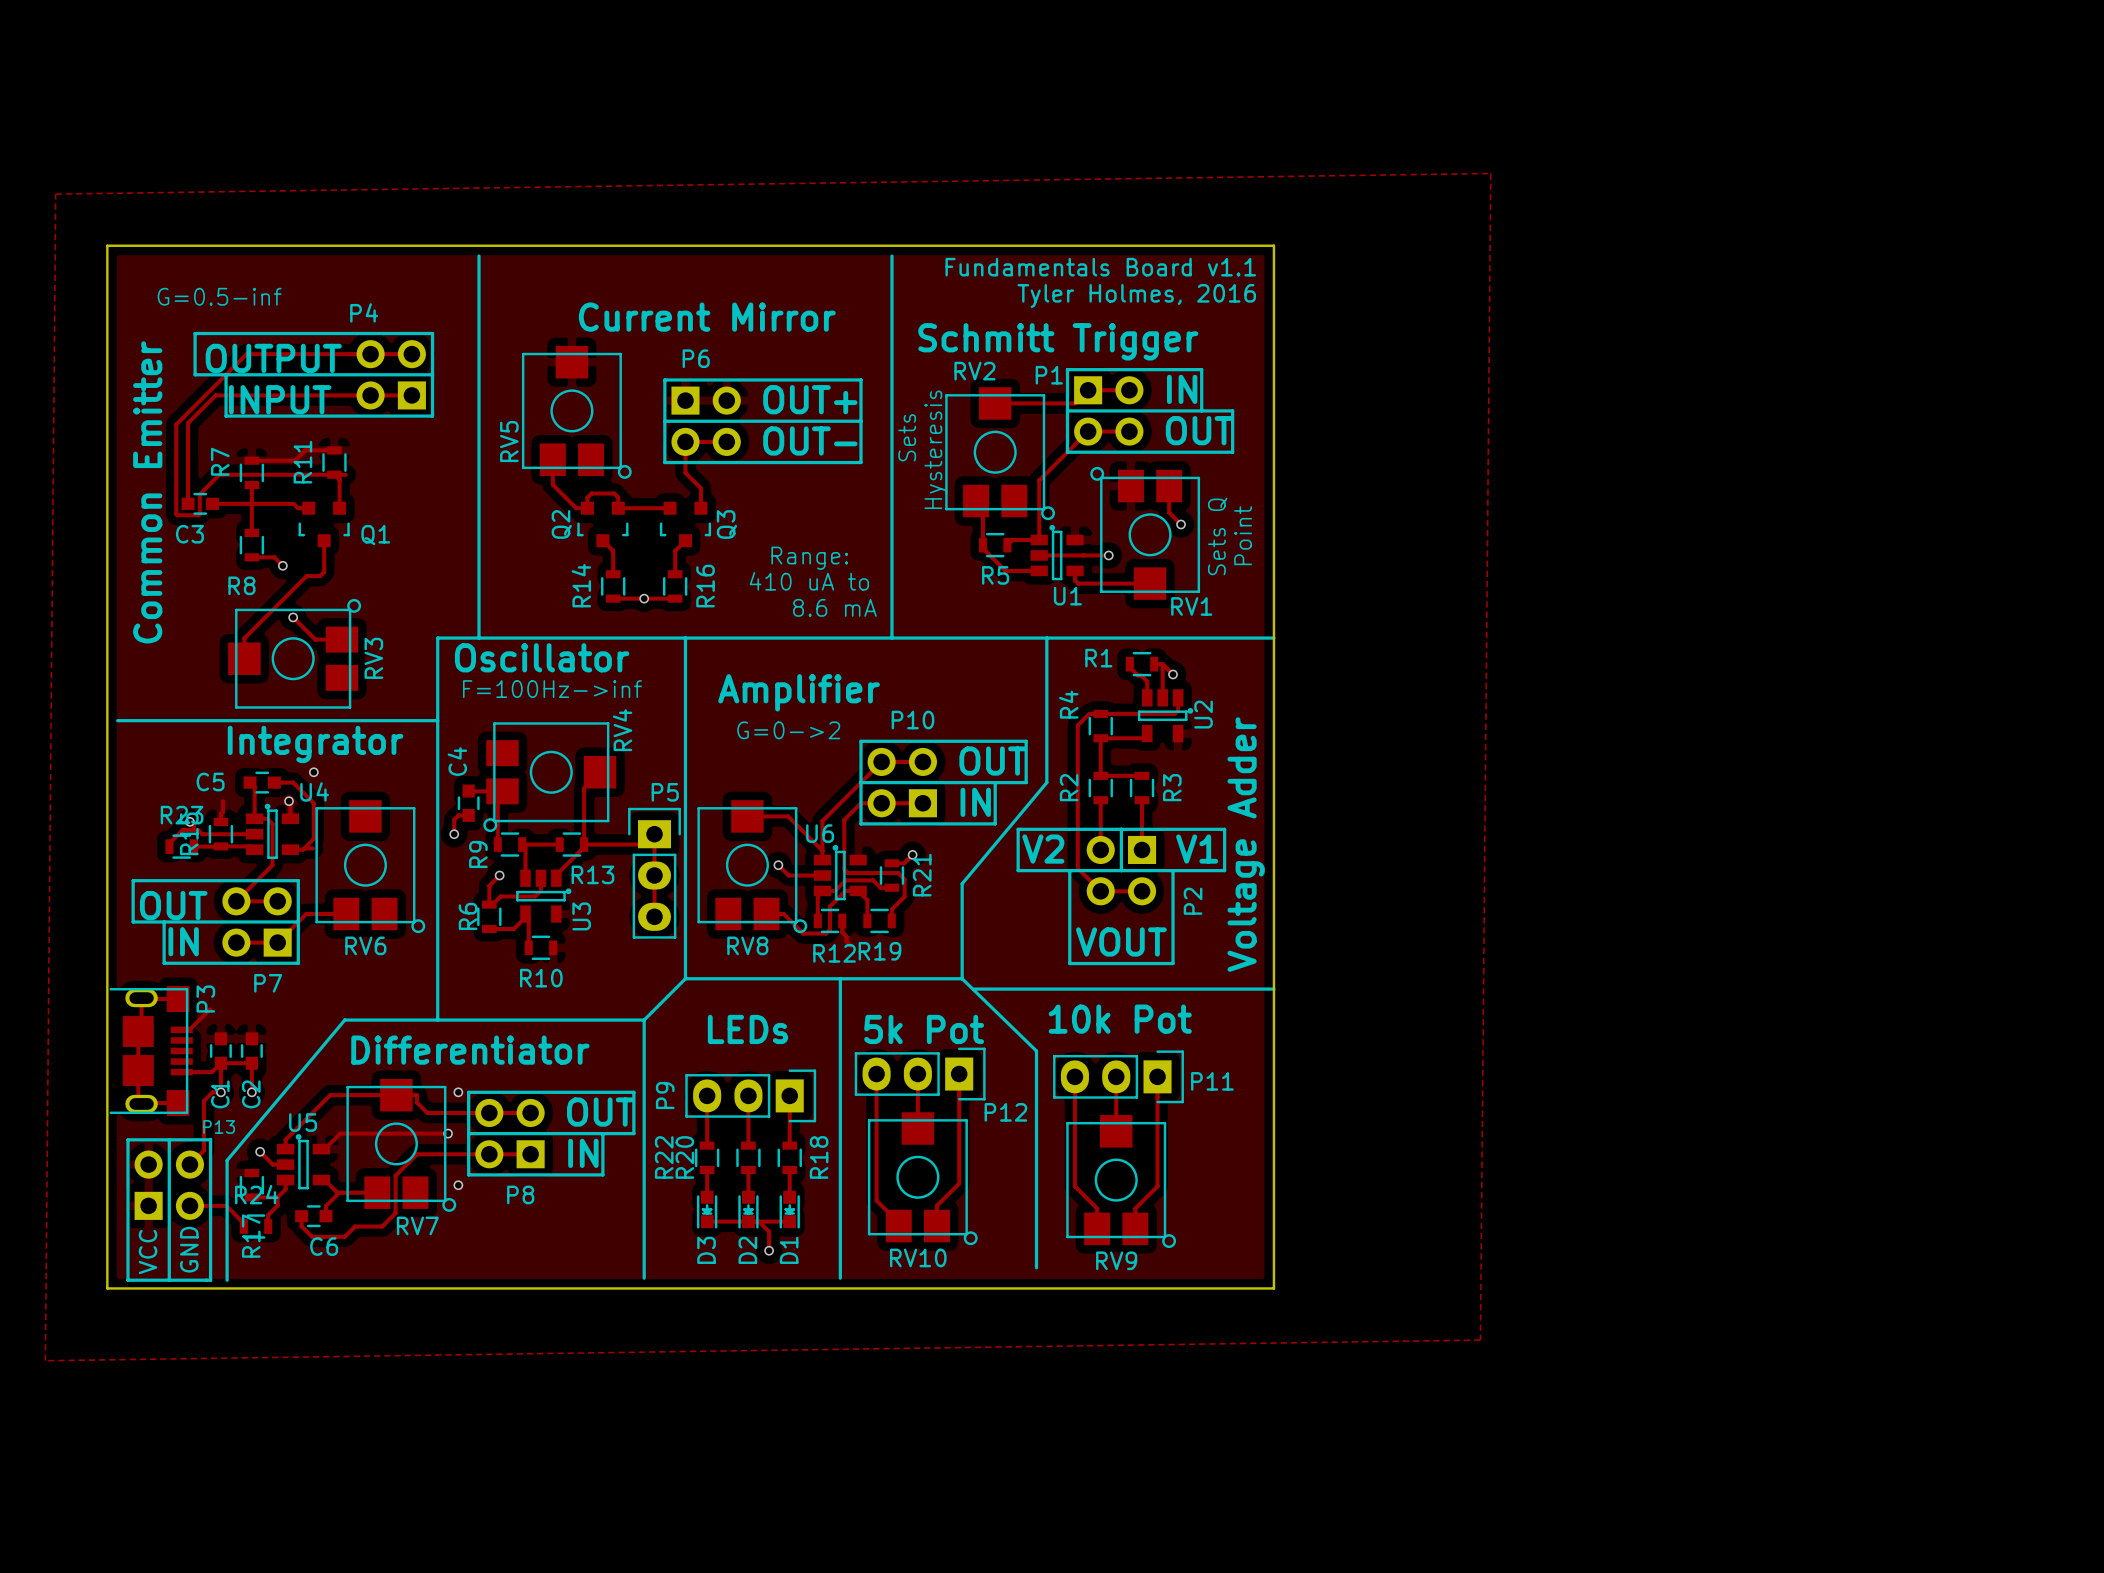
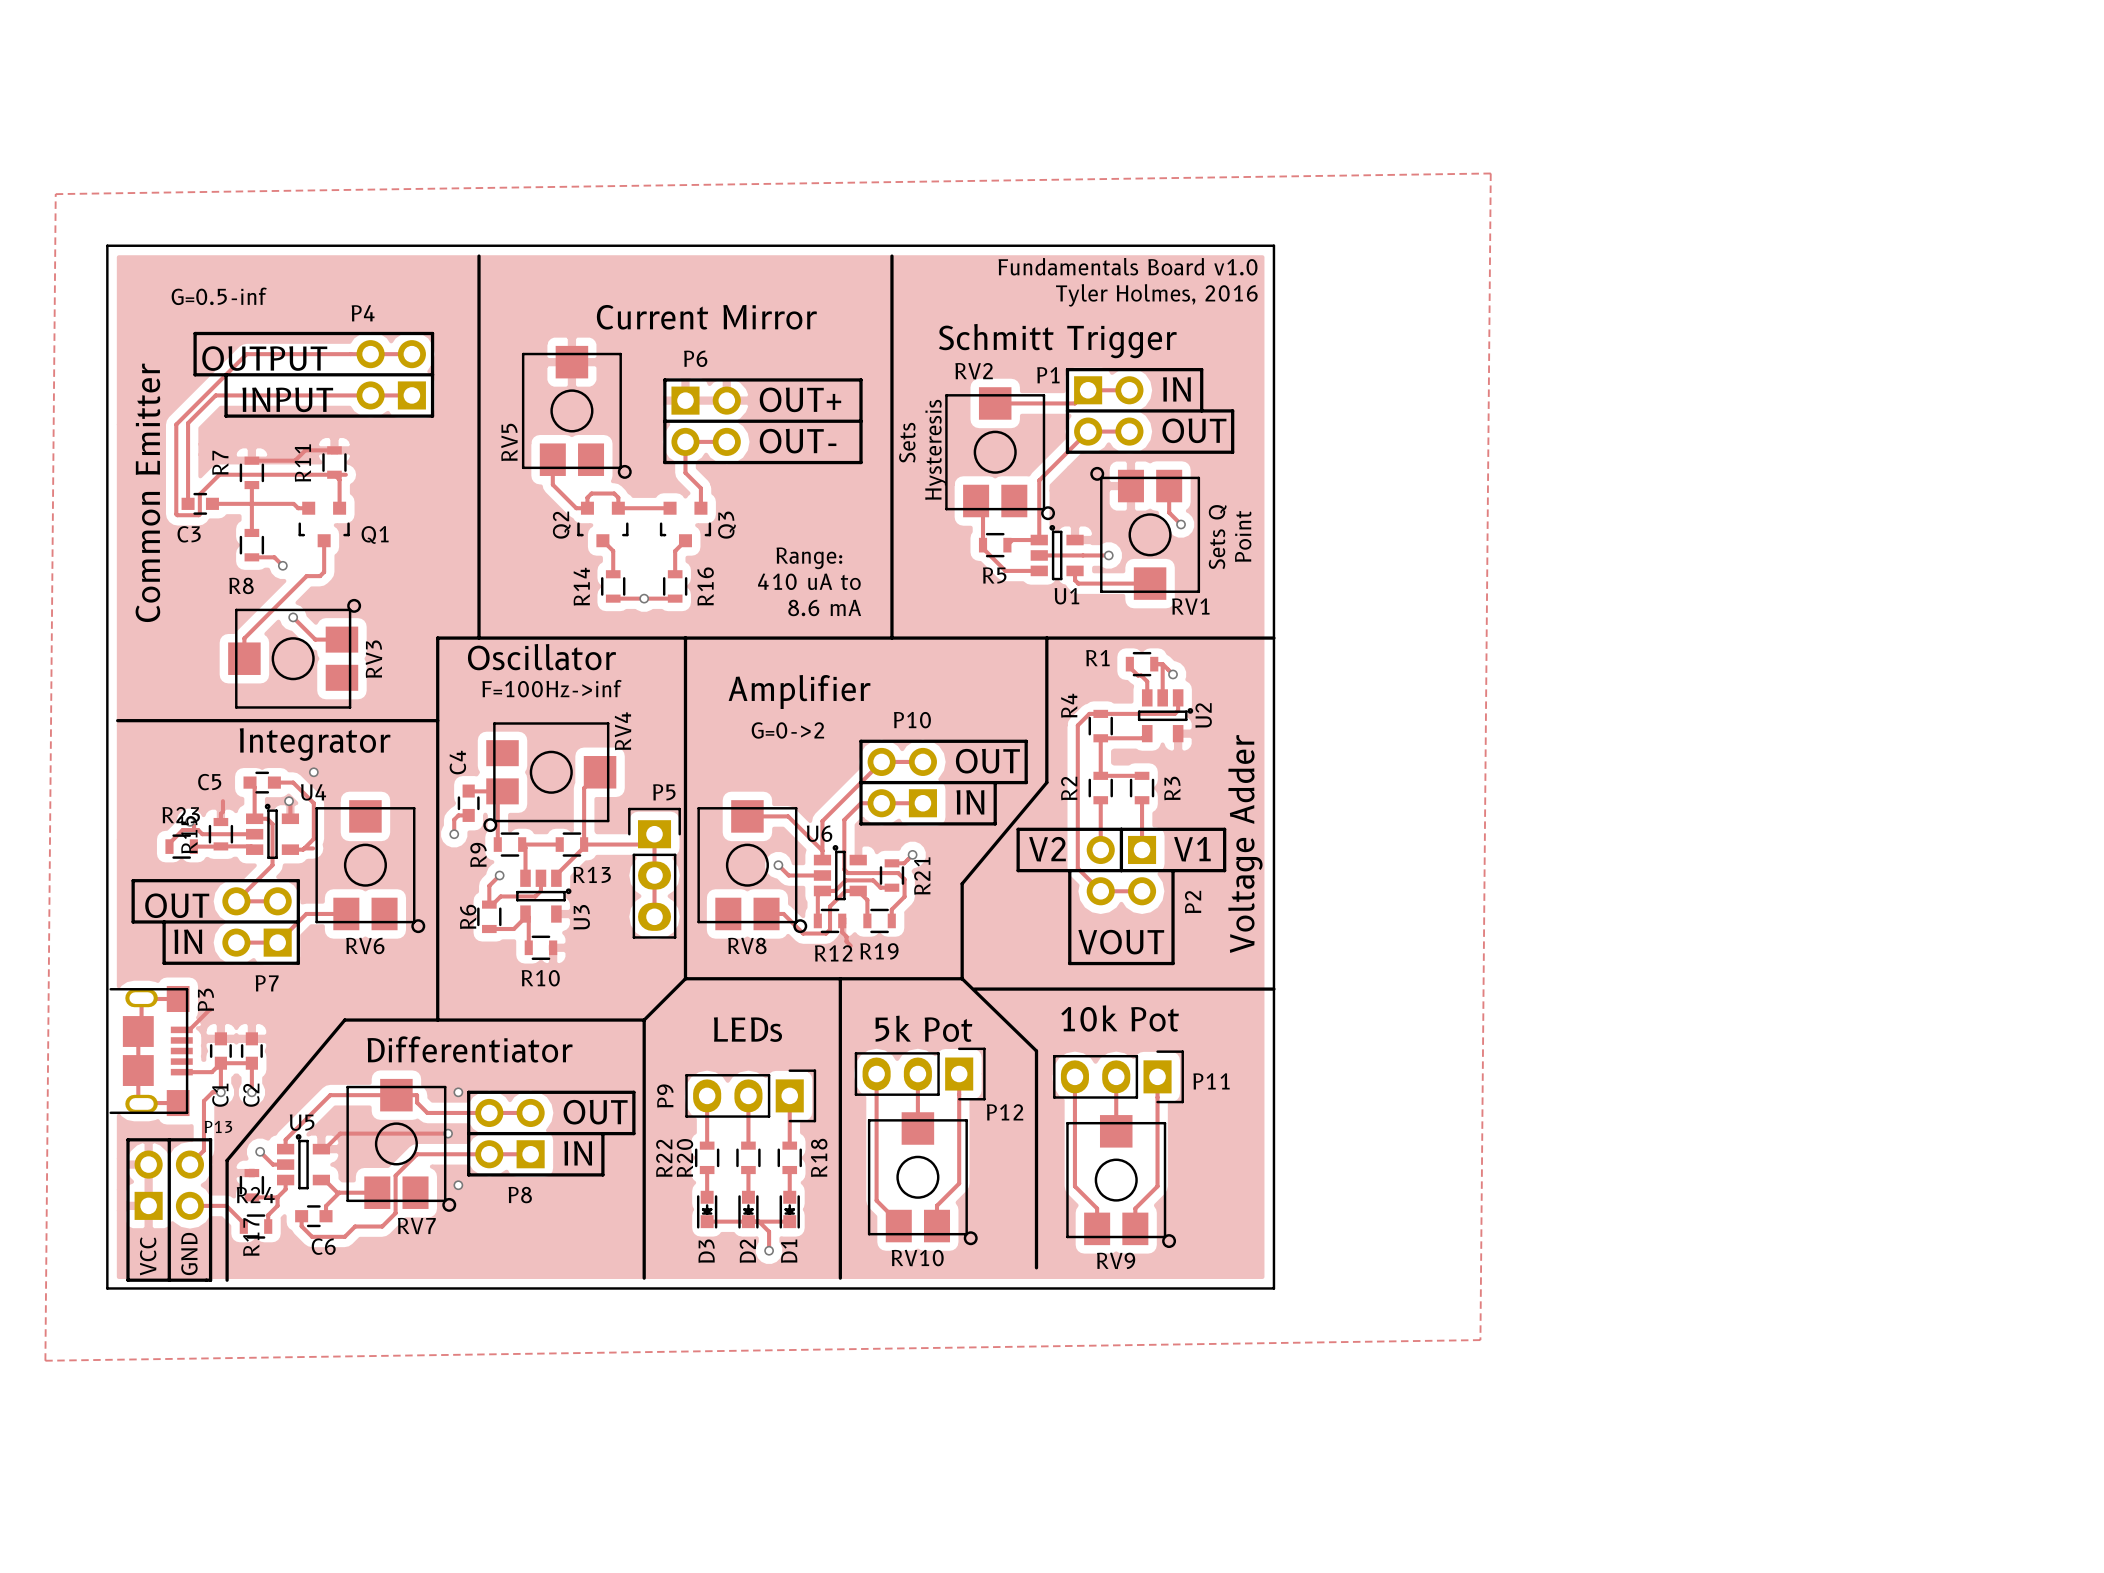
text: Fundamentals Board v1.1 (1100, 267) -> Fundamentals Board v1.0 (1128, 266)

